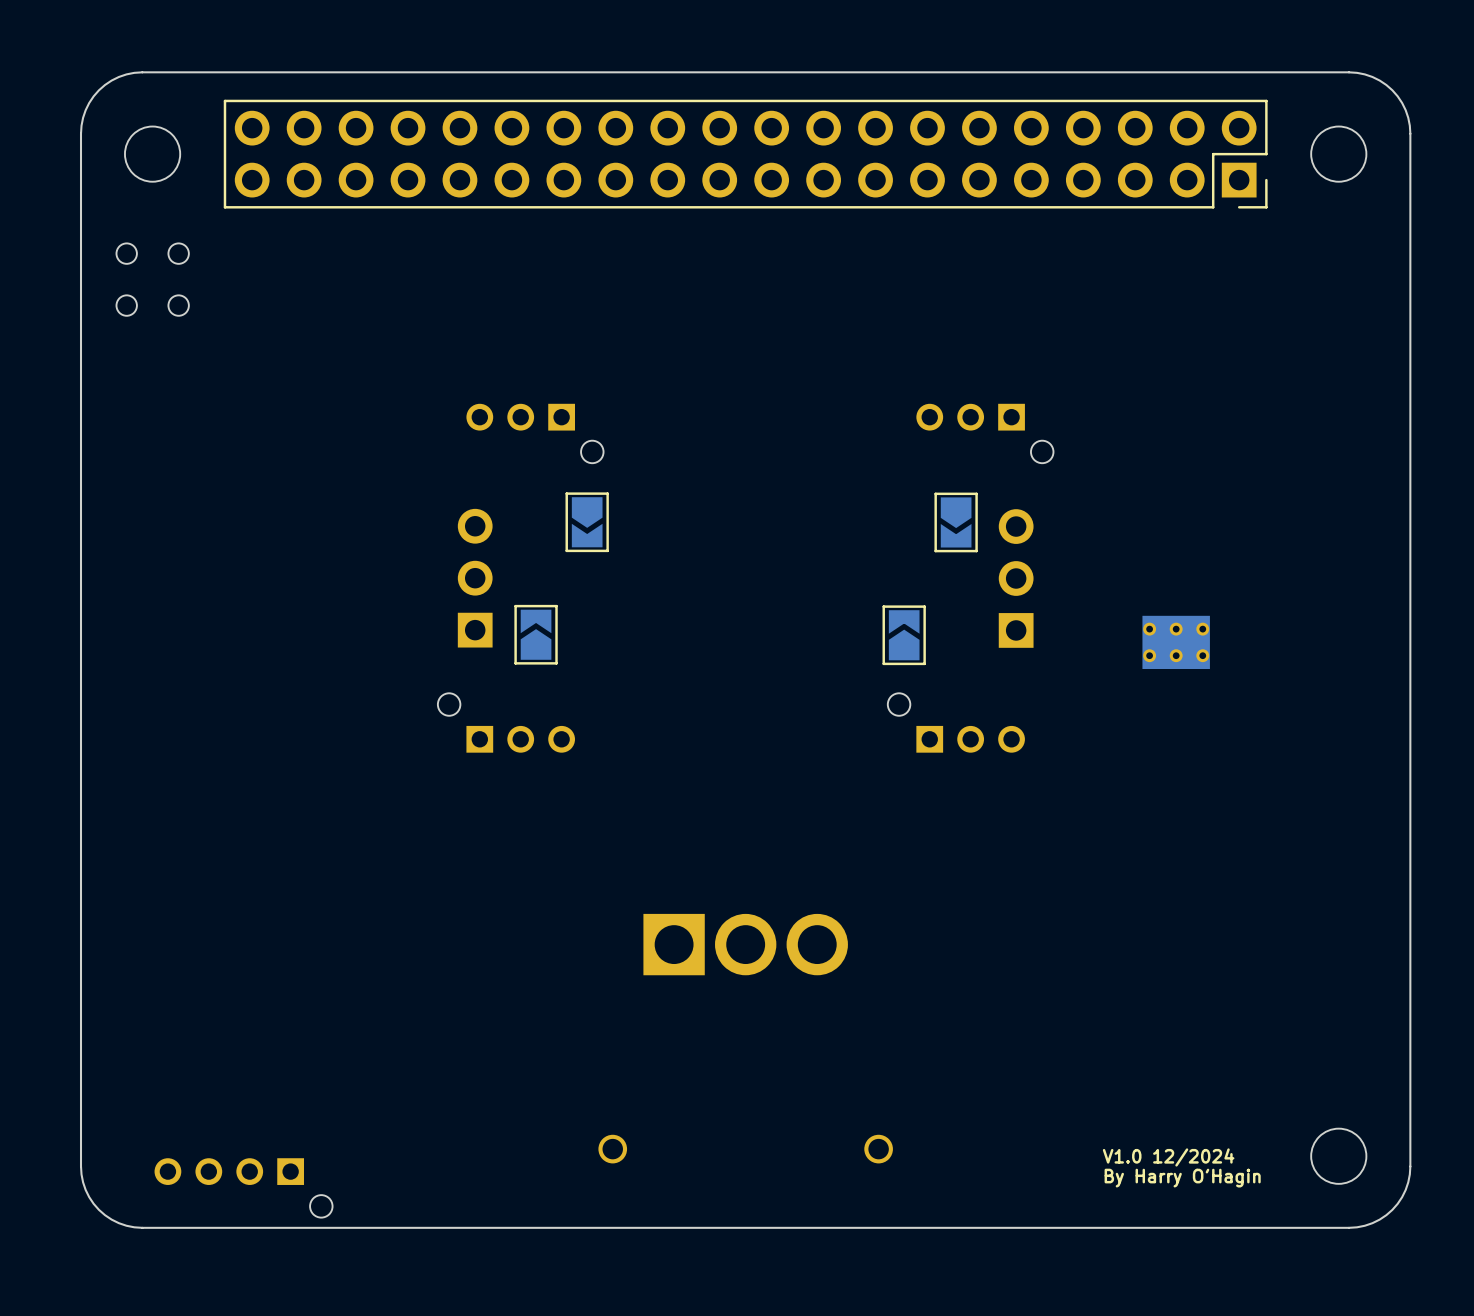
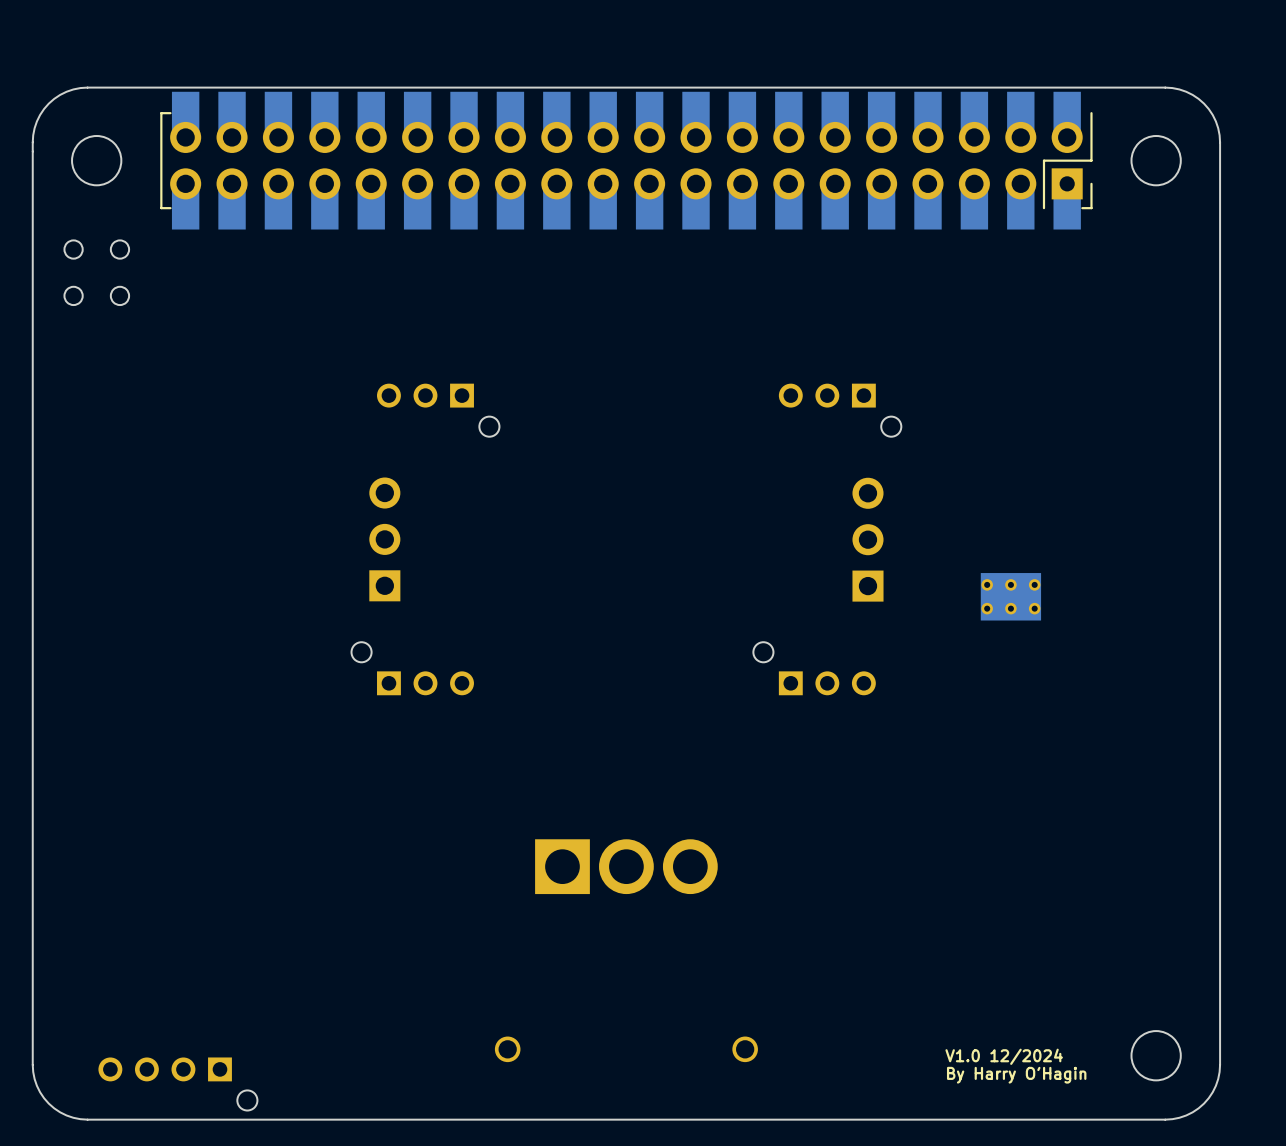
part footprint: [223, 99, 1268, 209] -> [160, 91, 1093, 230]
part: (587, 522) -> none
part: (956, 522) -> none
part: (536, 634) -> none
part: (904, 635) -> none

